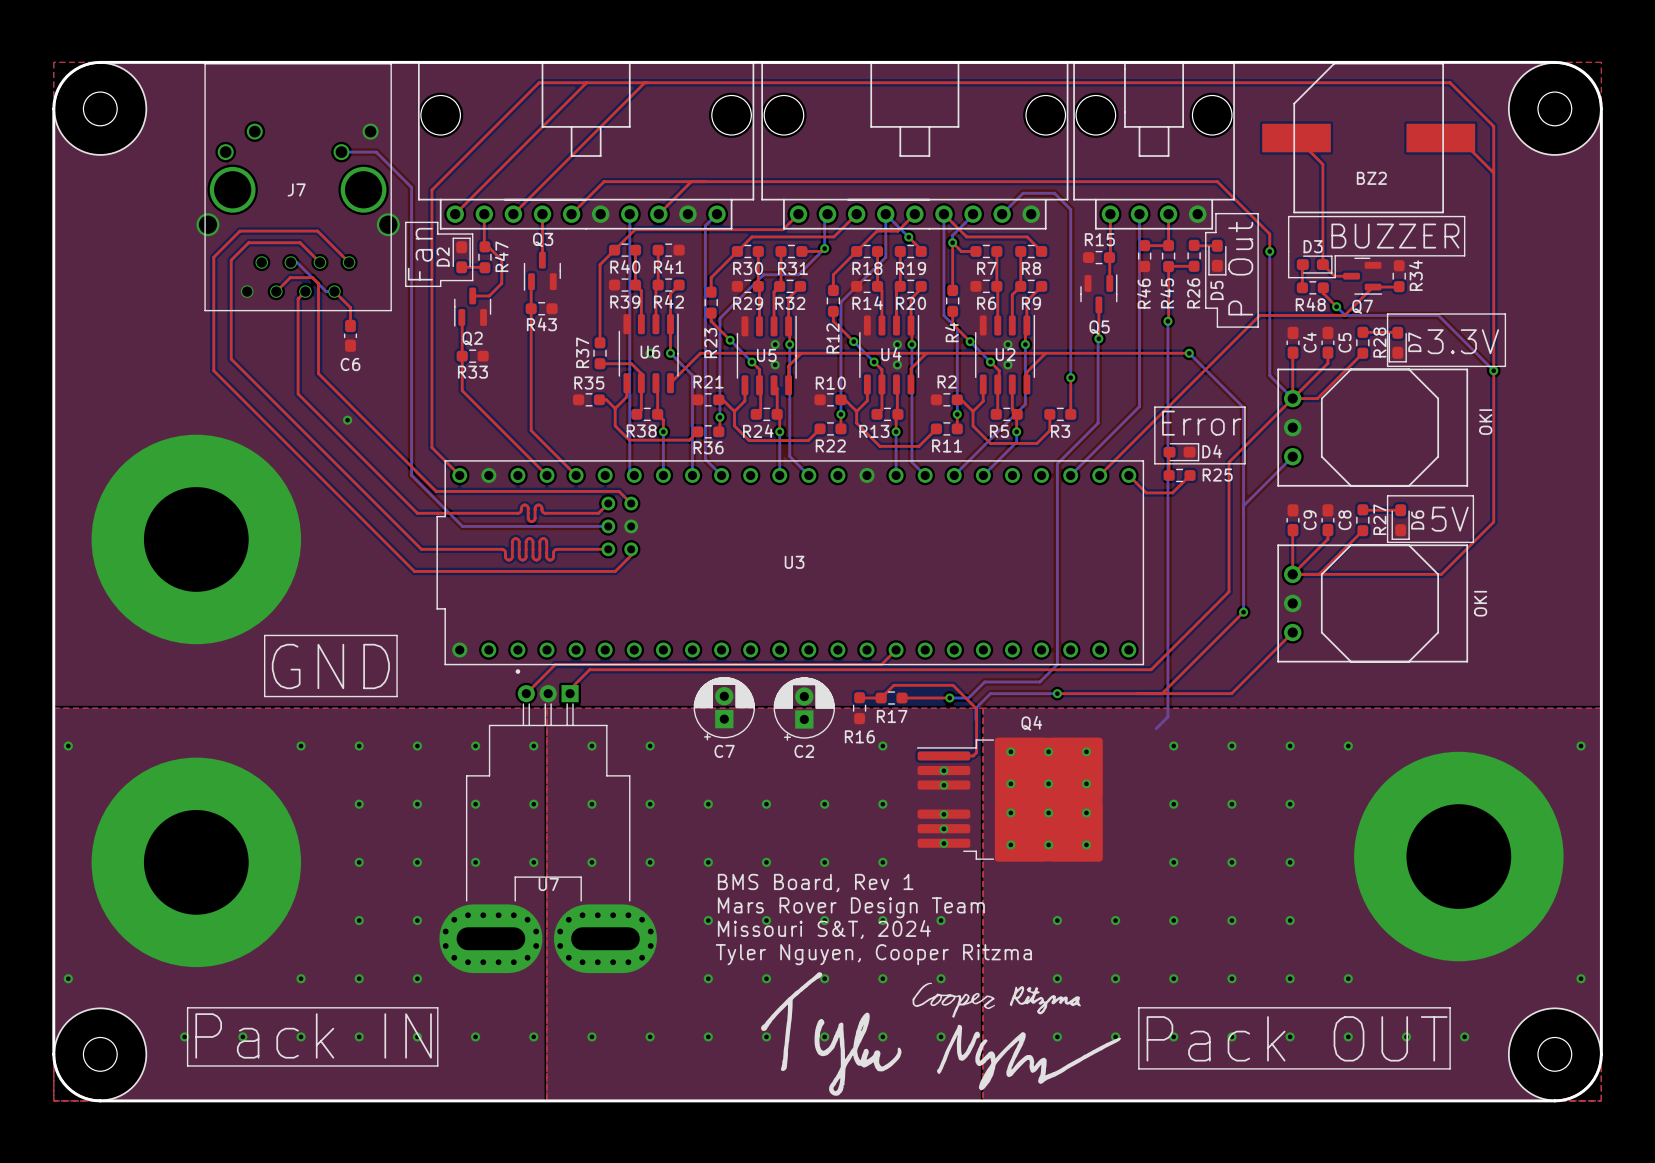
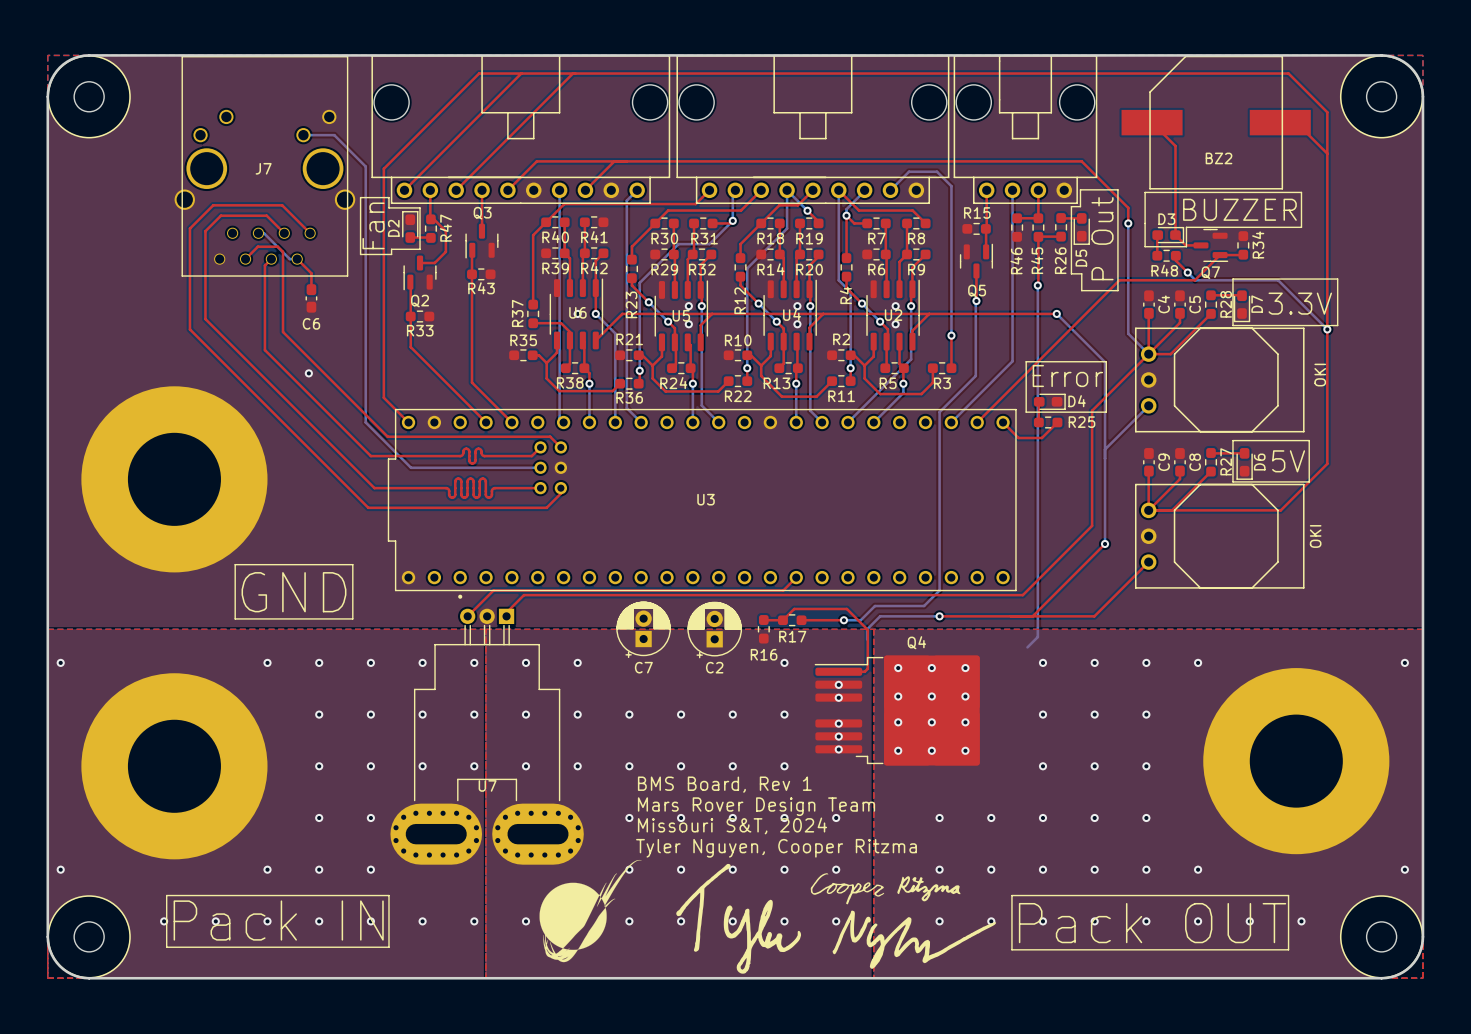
drawing: none -> [539, 859, 642, 963]

